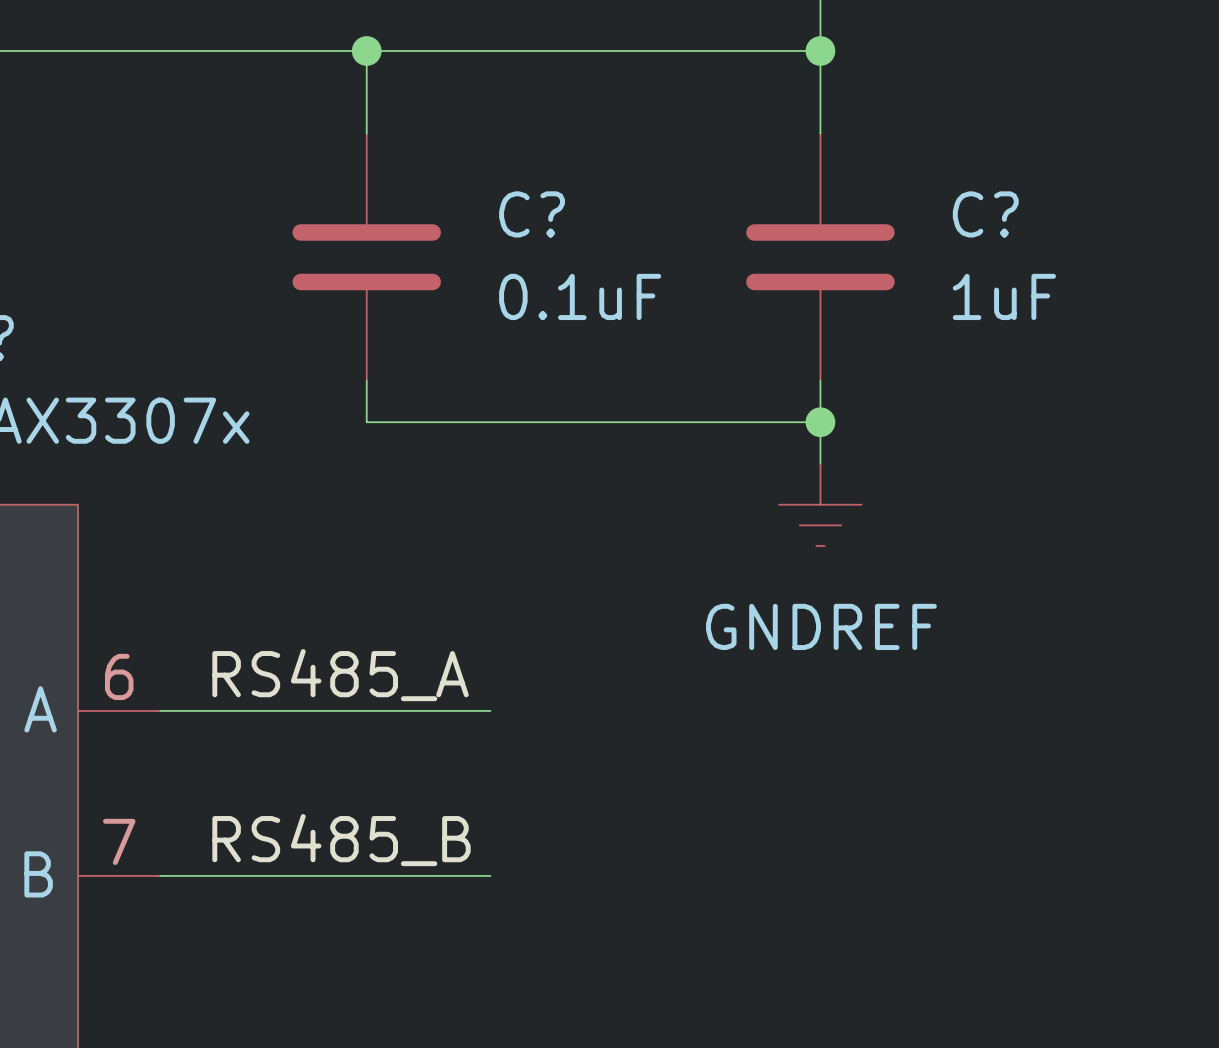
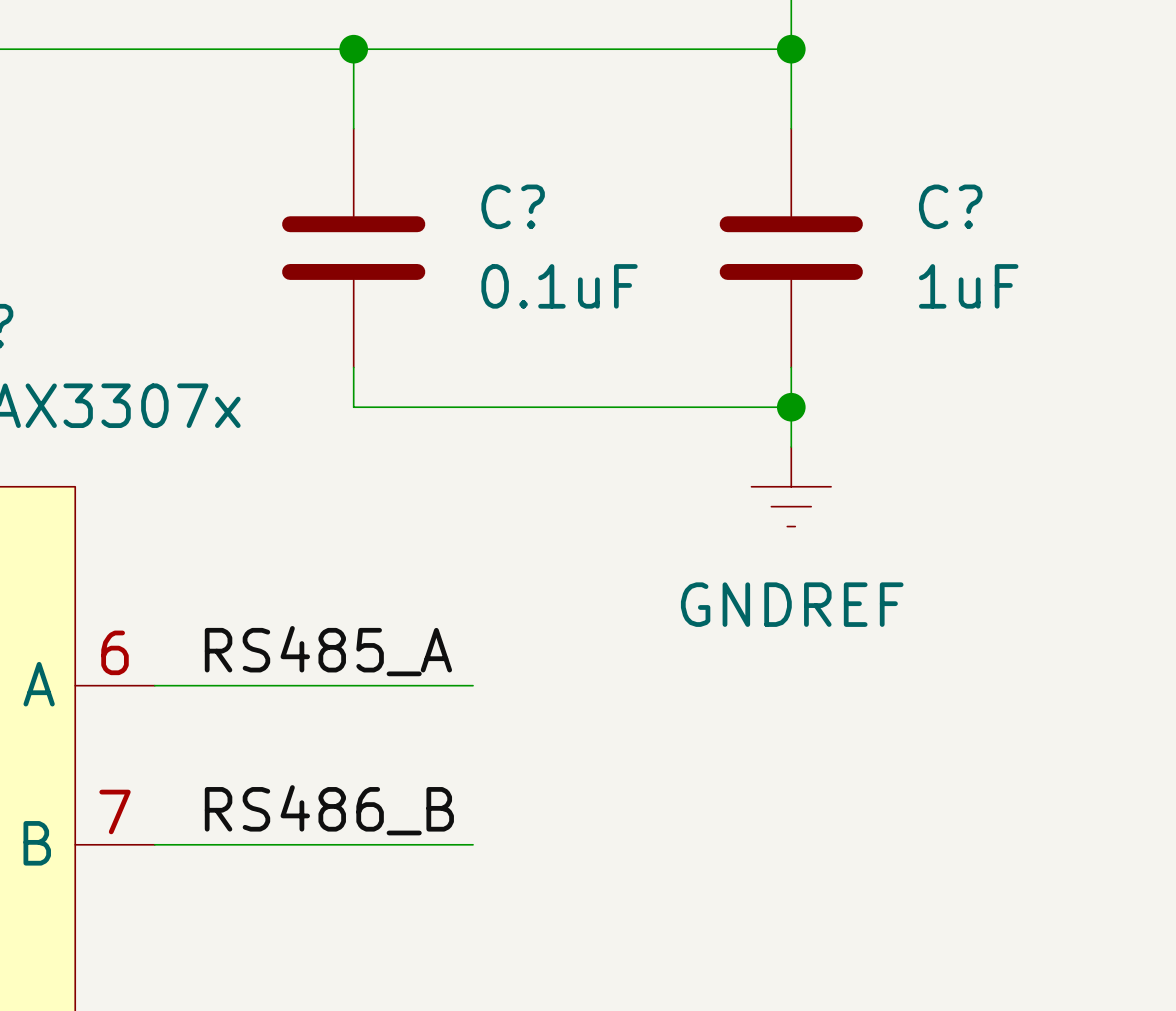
label: RS485_B (341, 840) -> RS486_B (329, 810)

